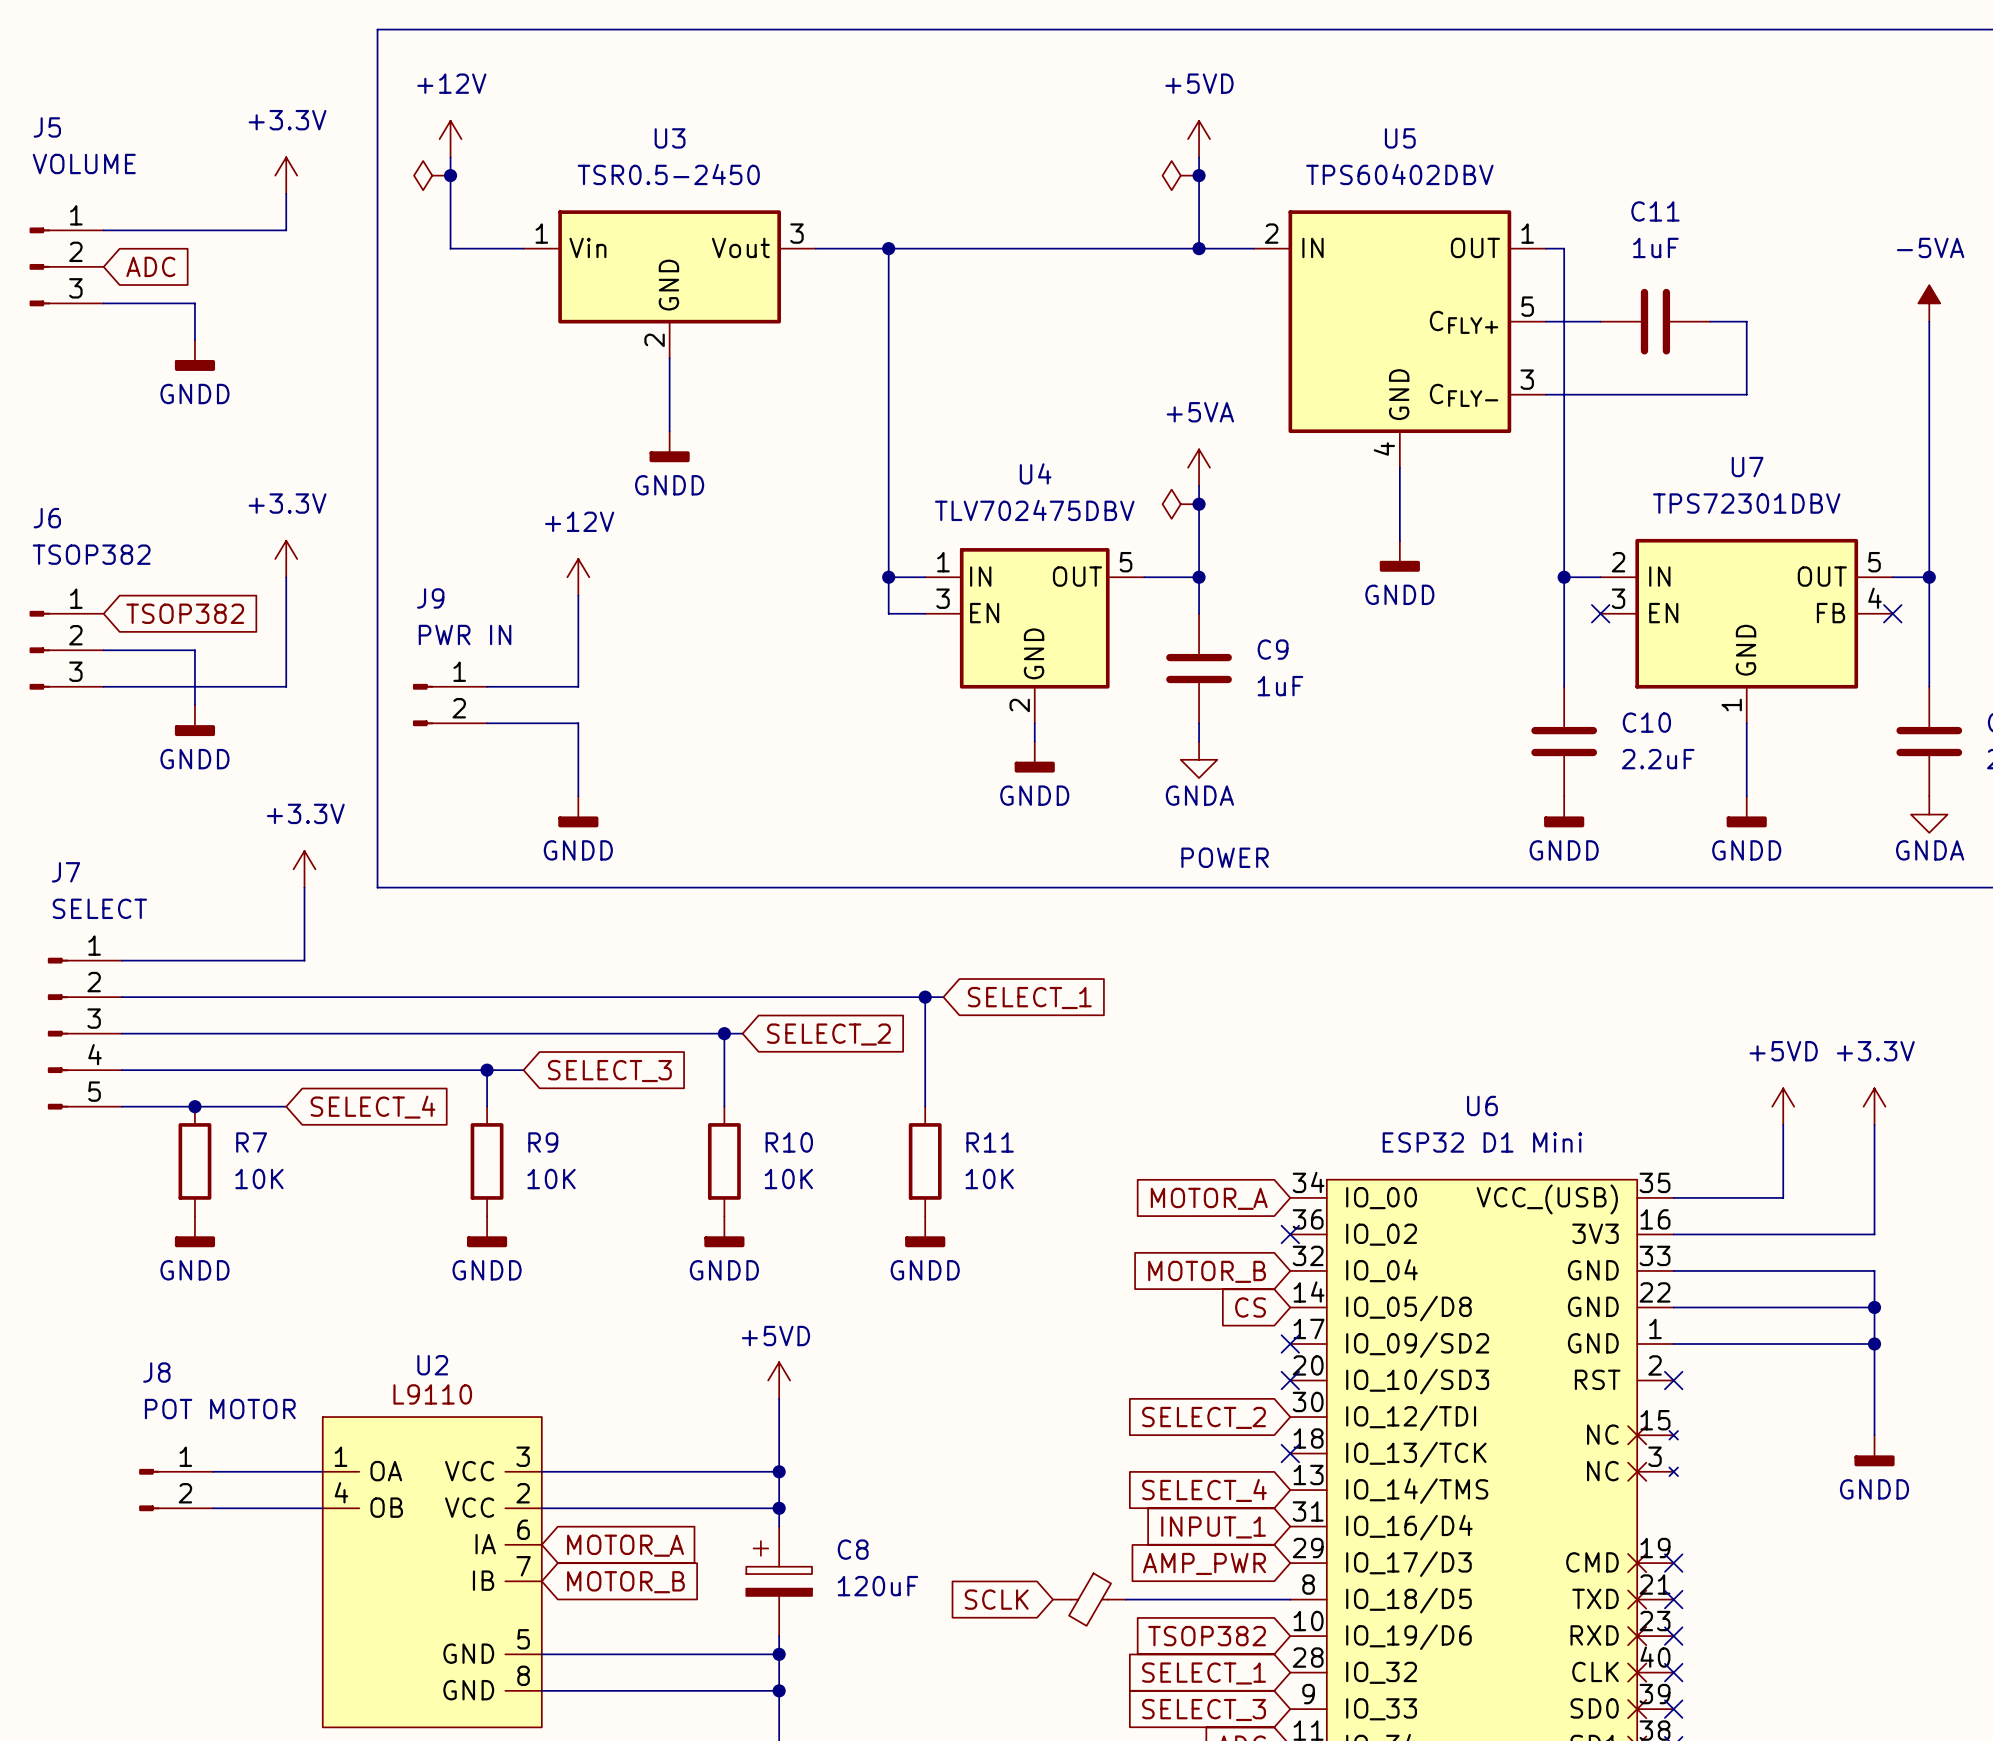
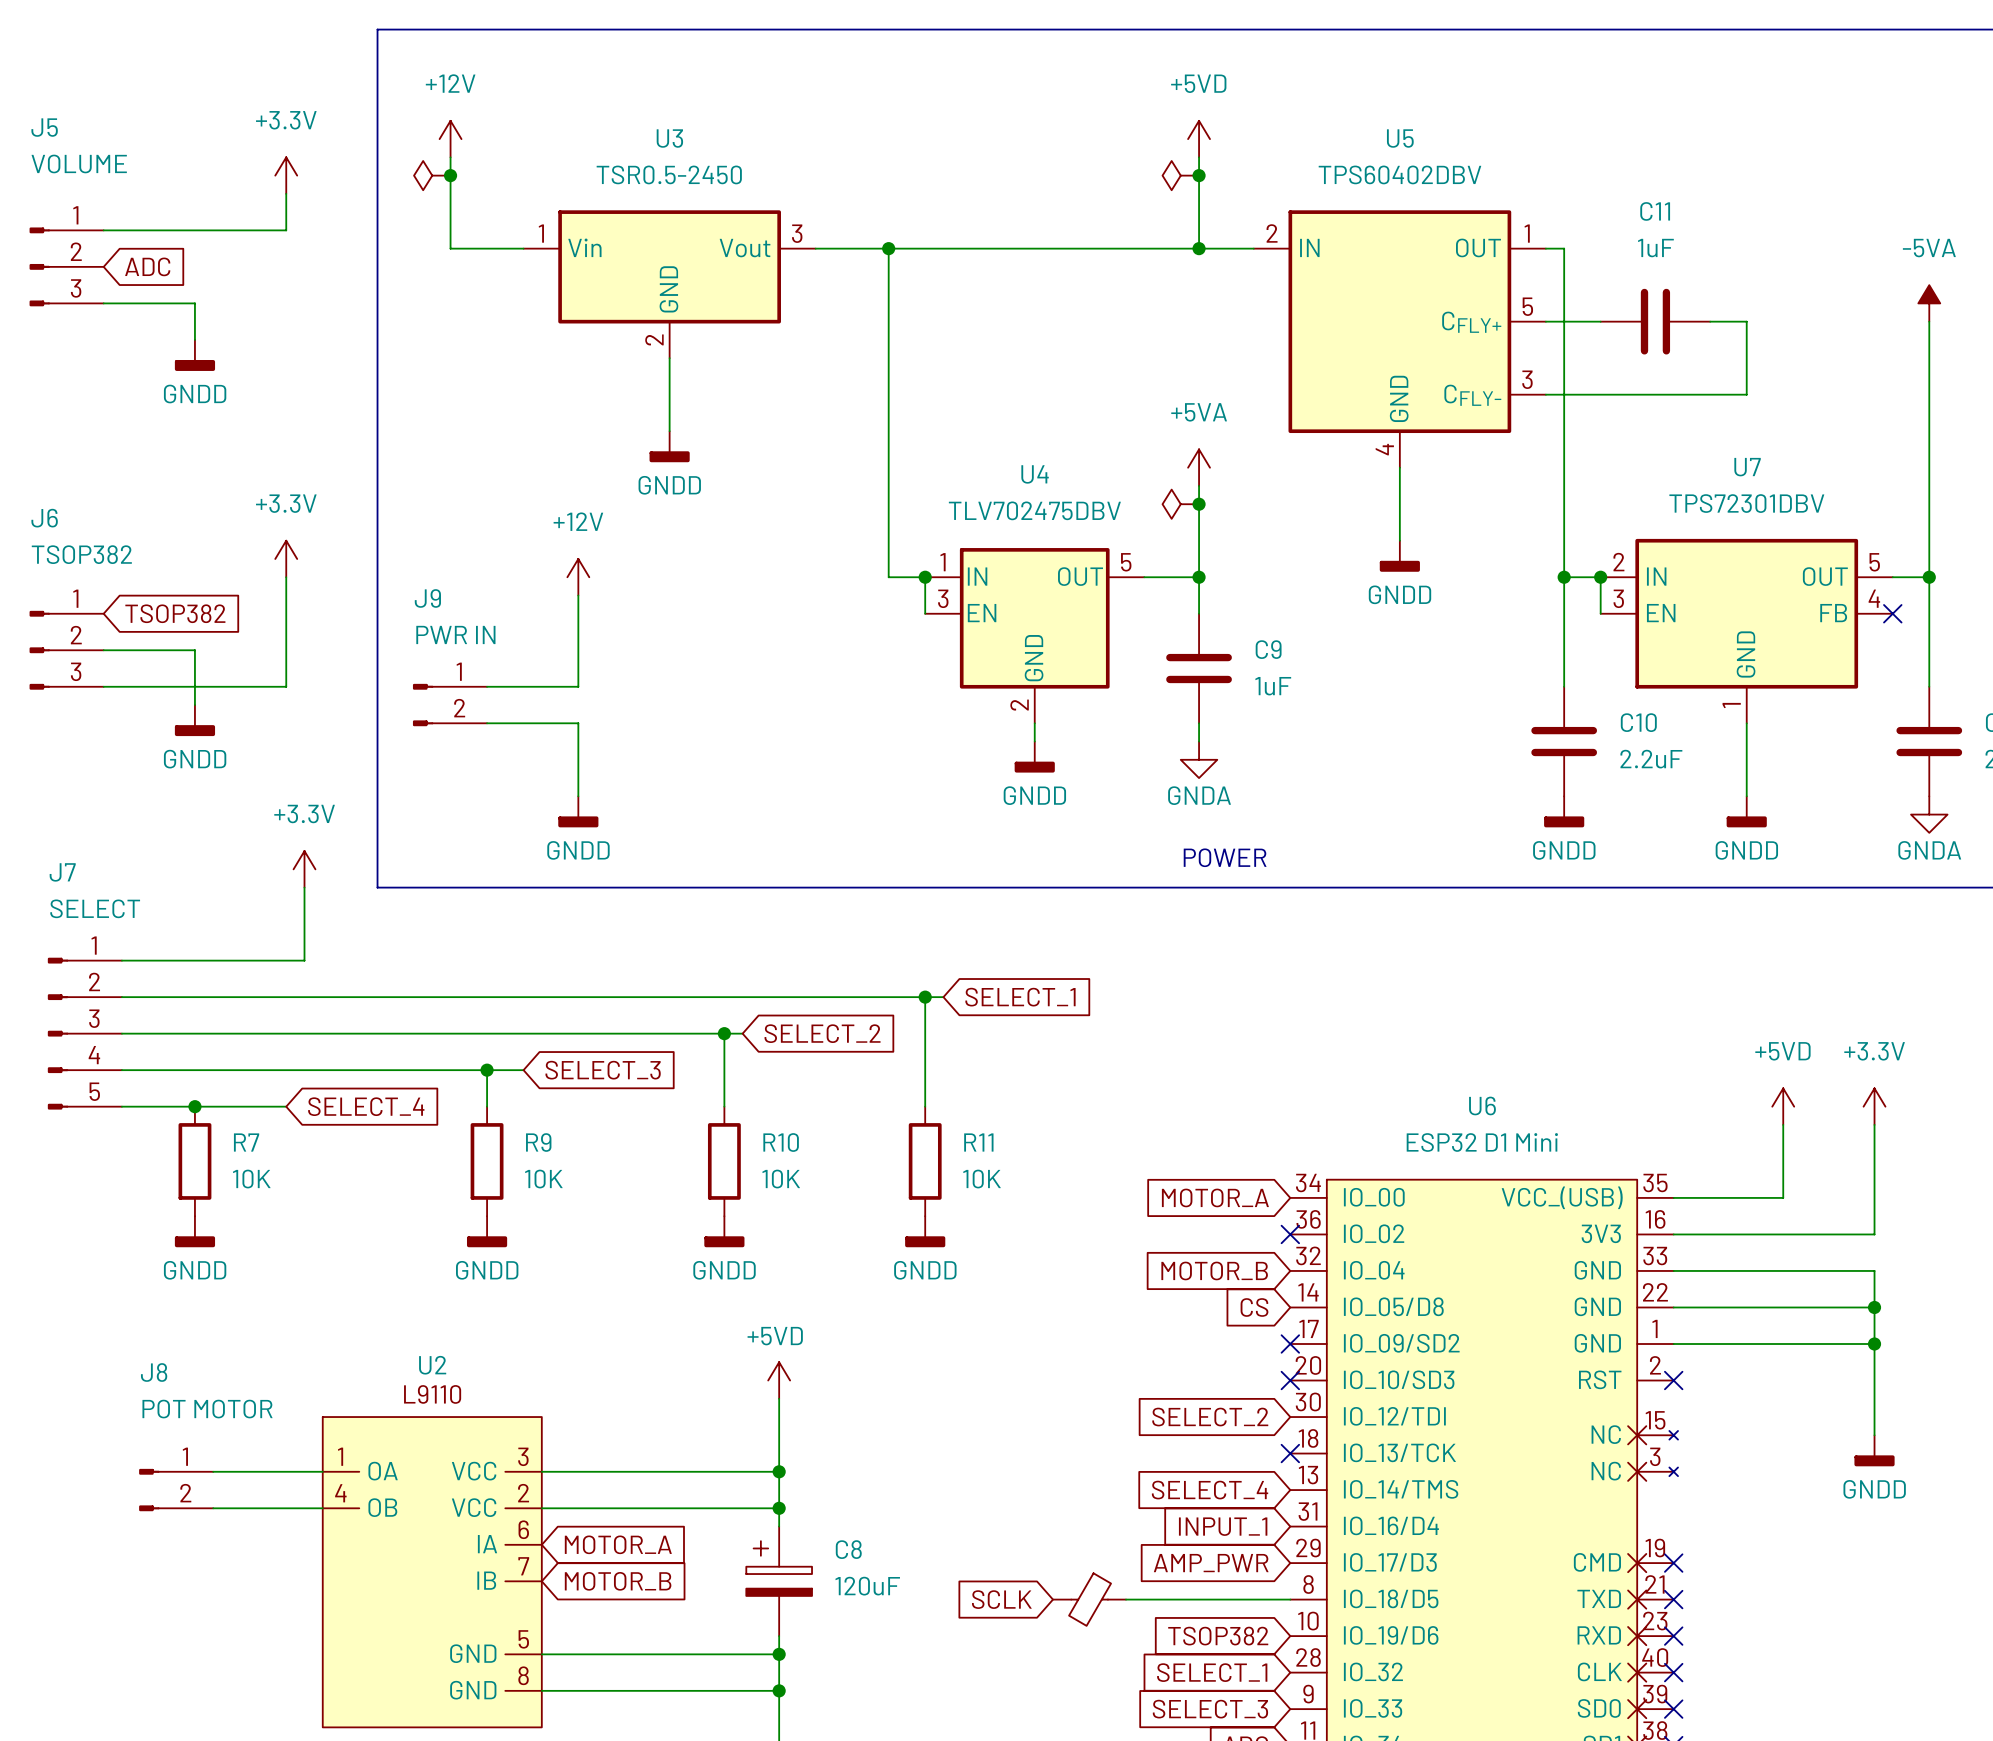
wire: (888, 577) (888, 613) (925, 613) -> (925, 577) (925, 613)
junction position: (888, 577) -> (925, 577)
wire: none -> (1600, 577) (1600, 613)
junction: none -> (1600, 577)
no-connect mark: (1600, 613) -> none

